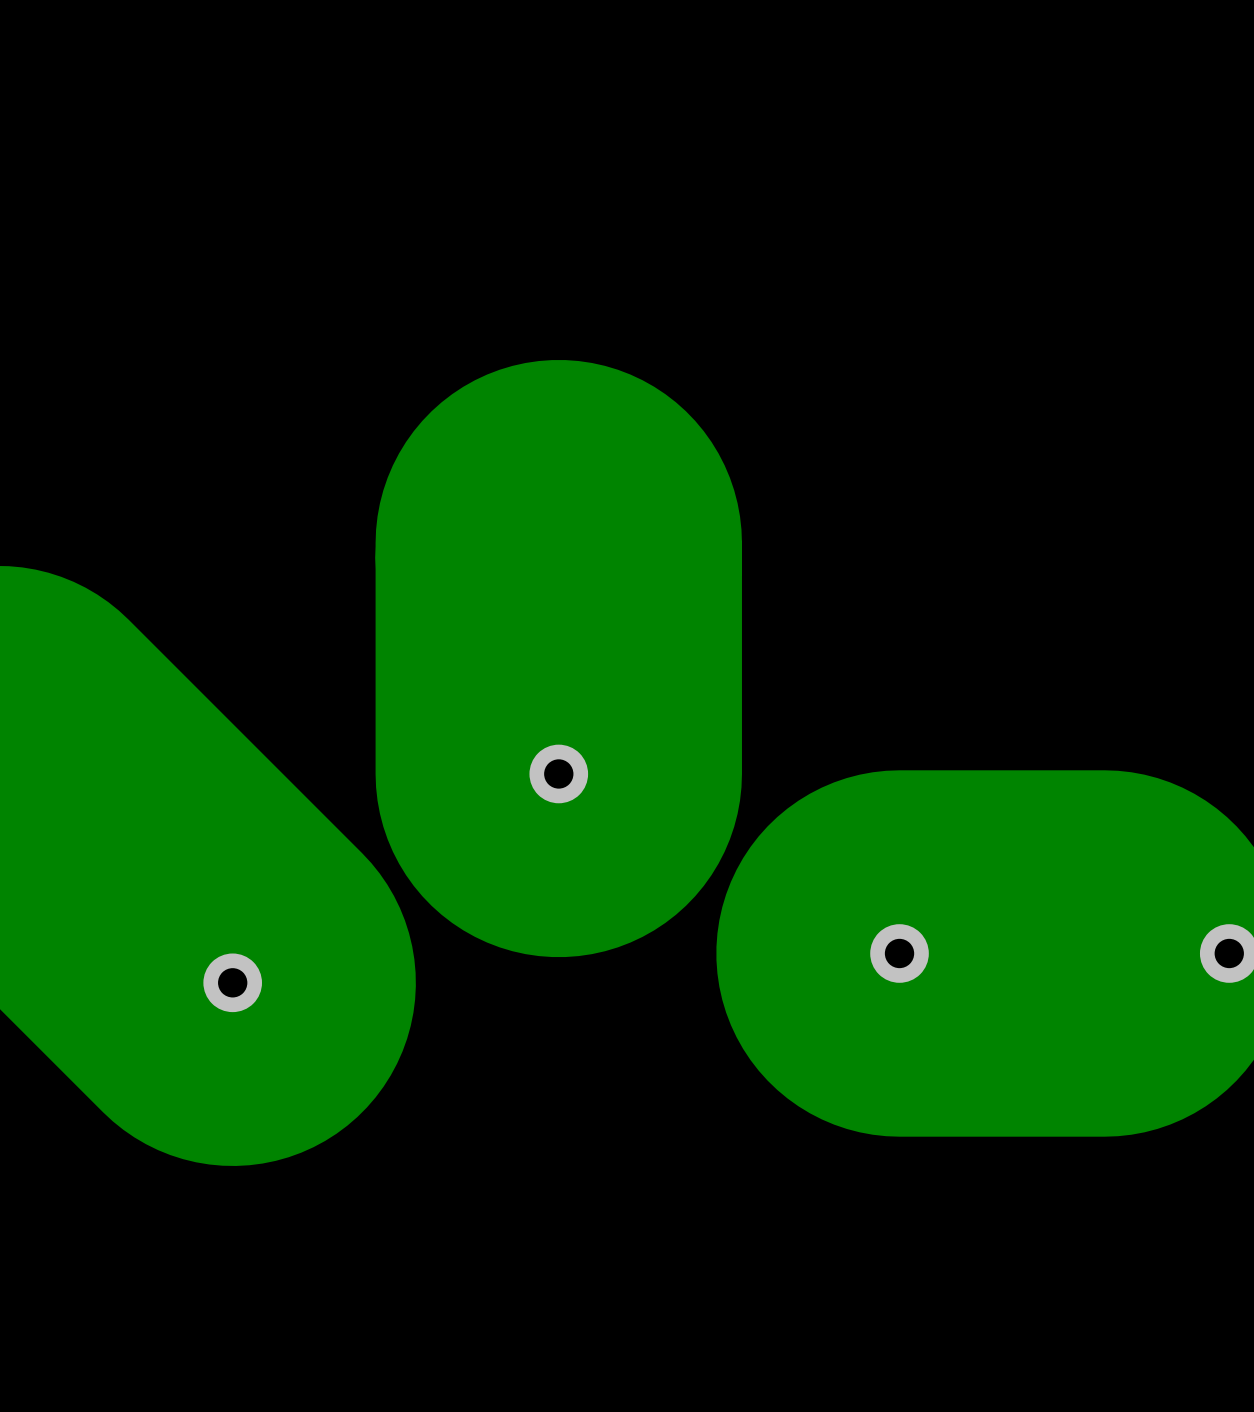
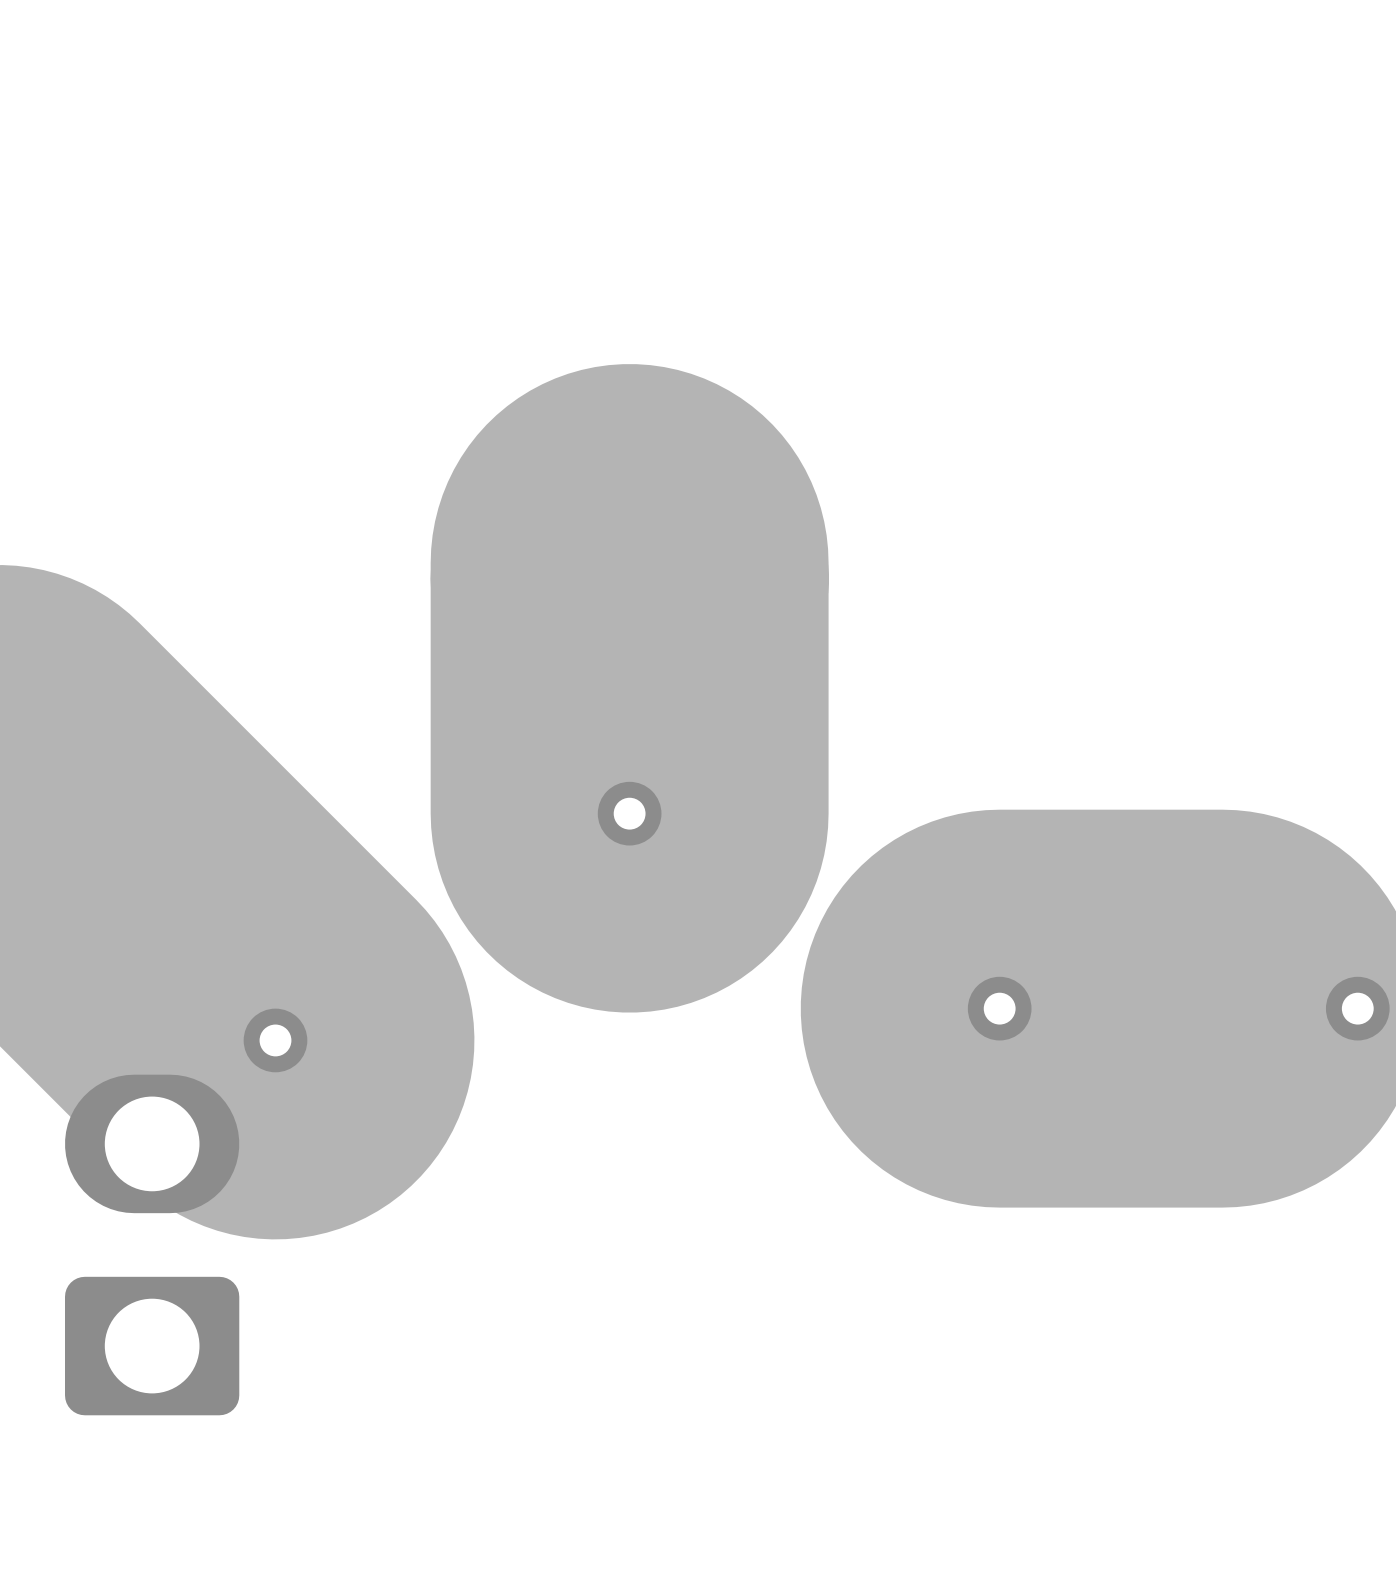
part: none -> (152, 1244)

